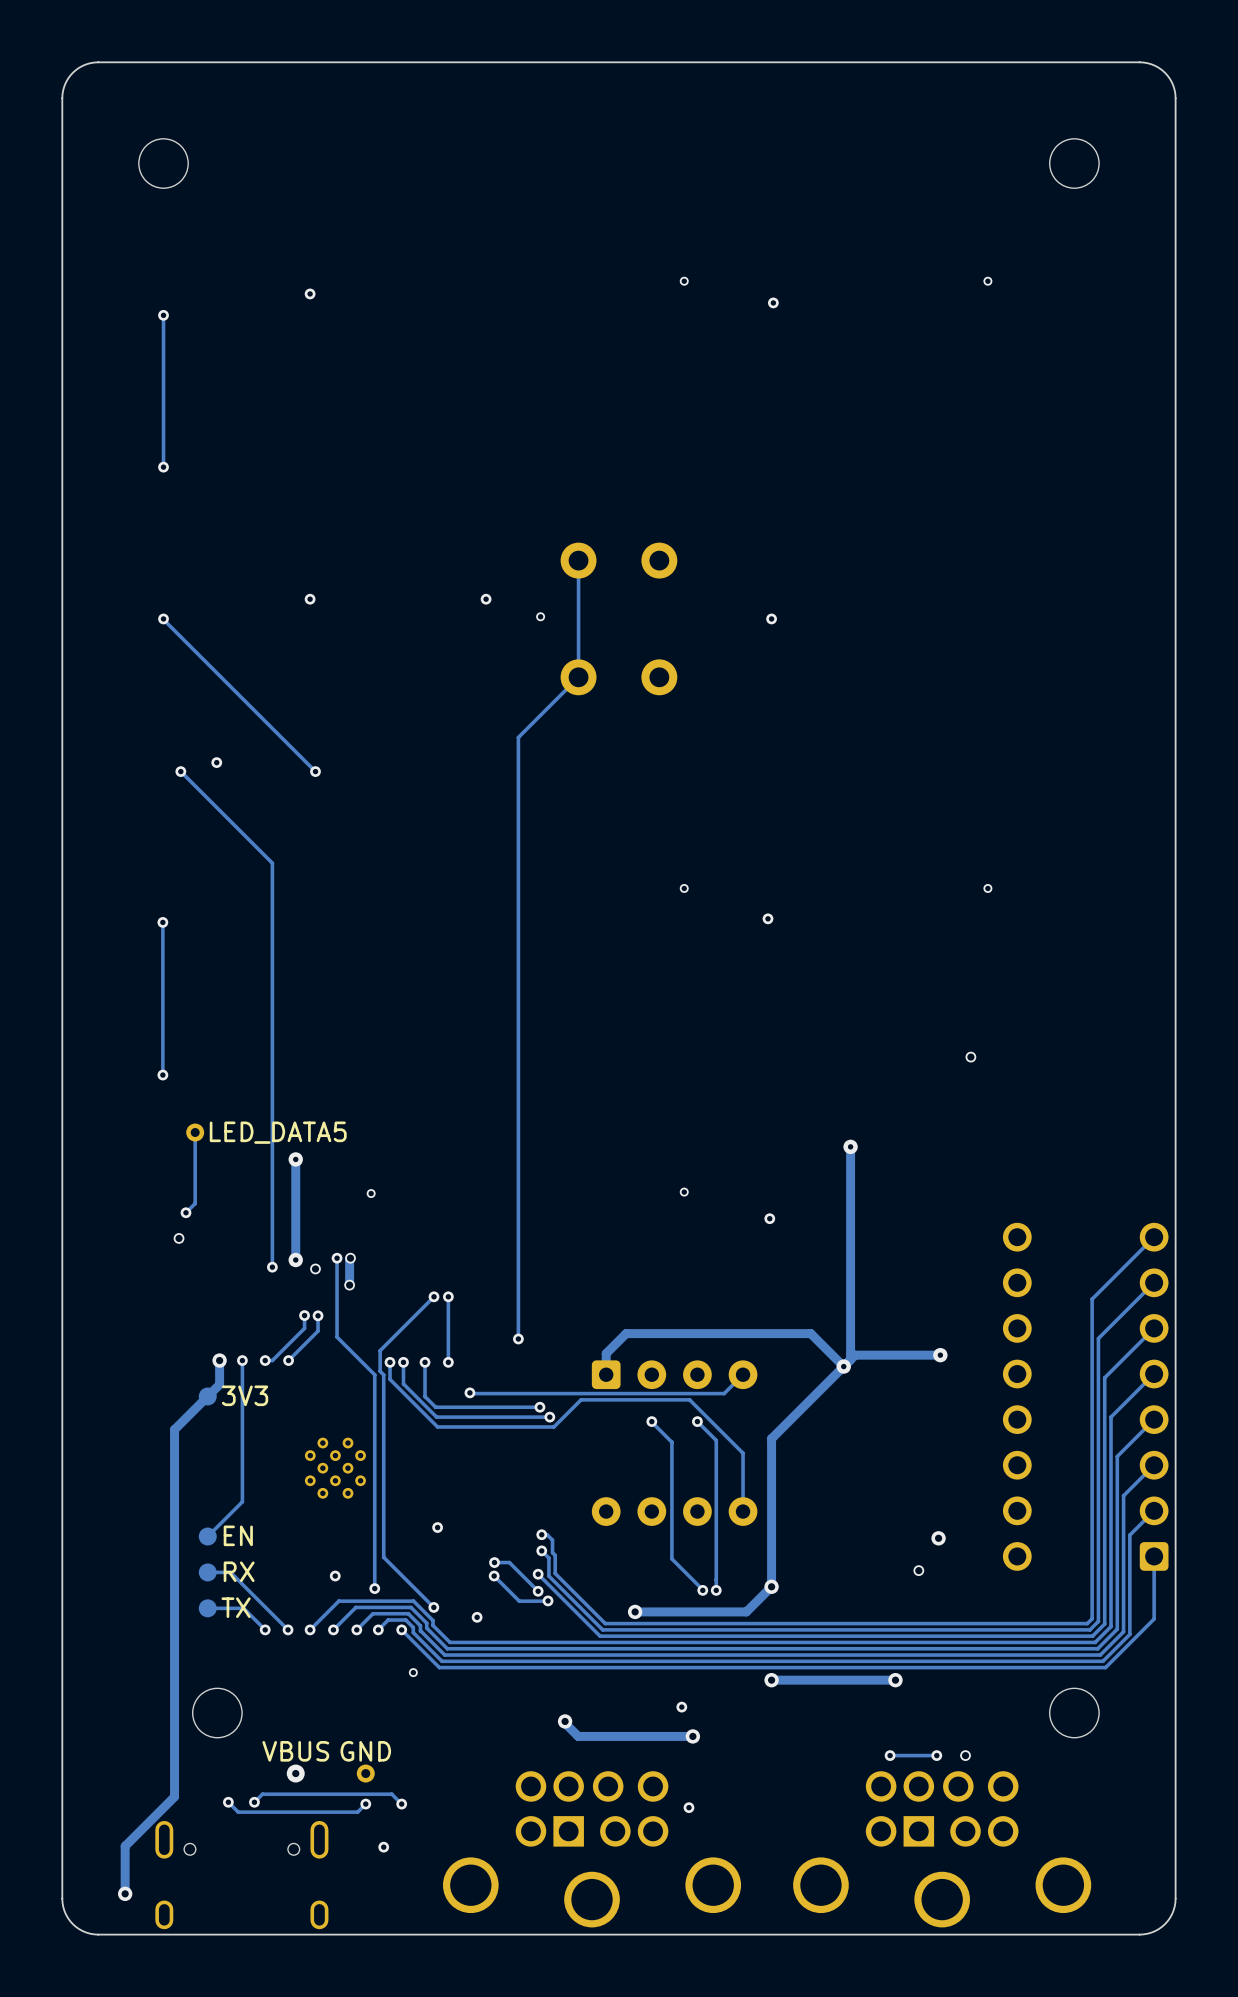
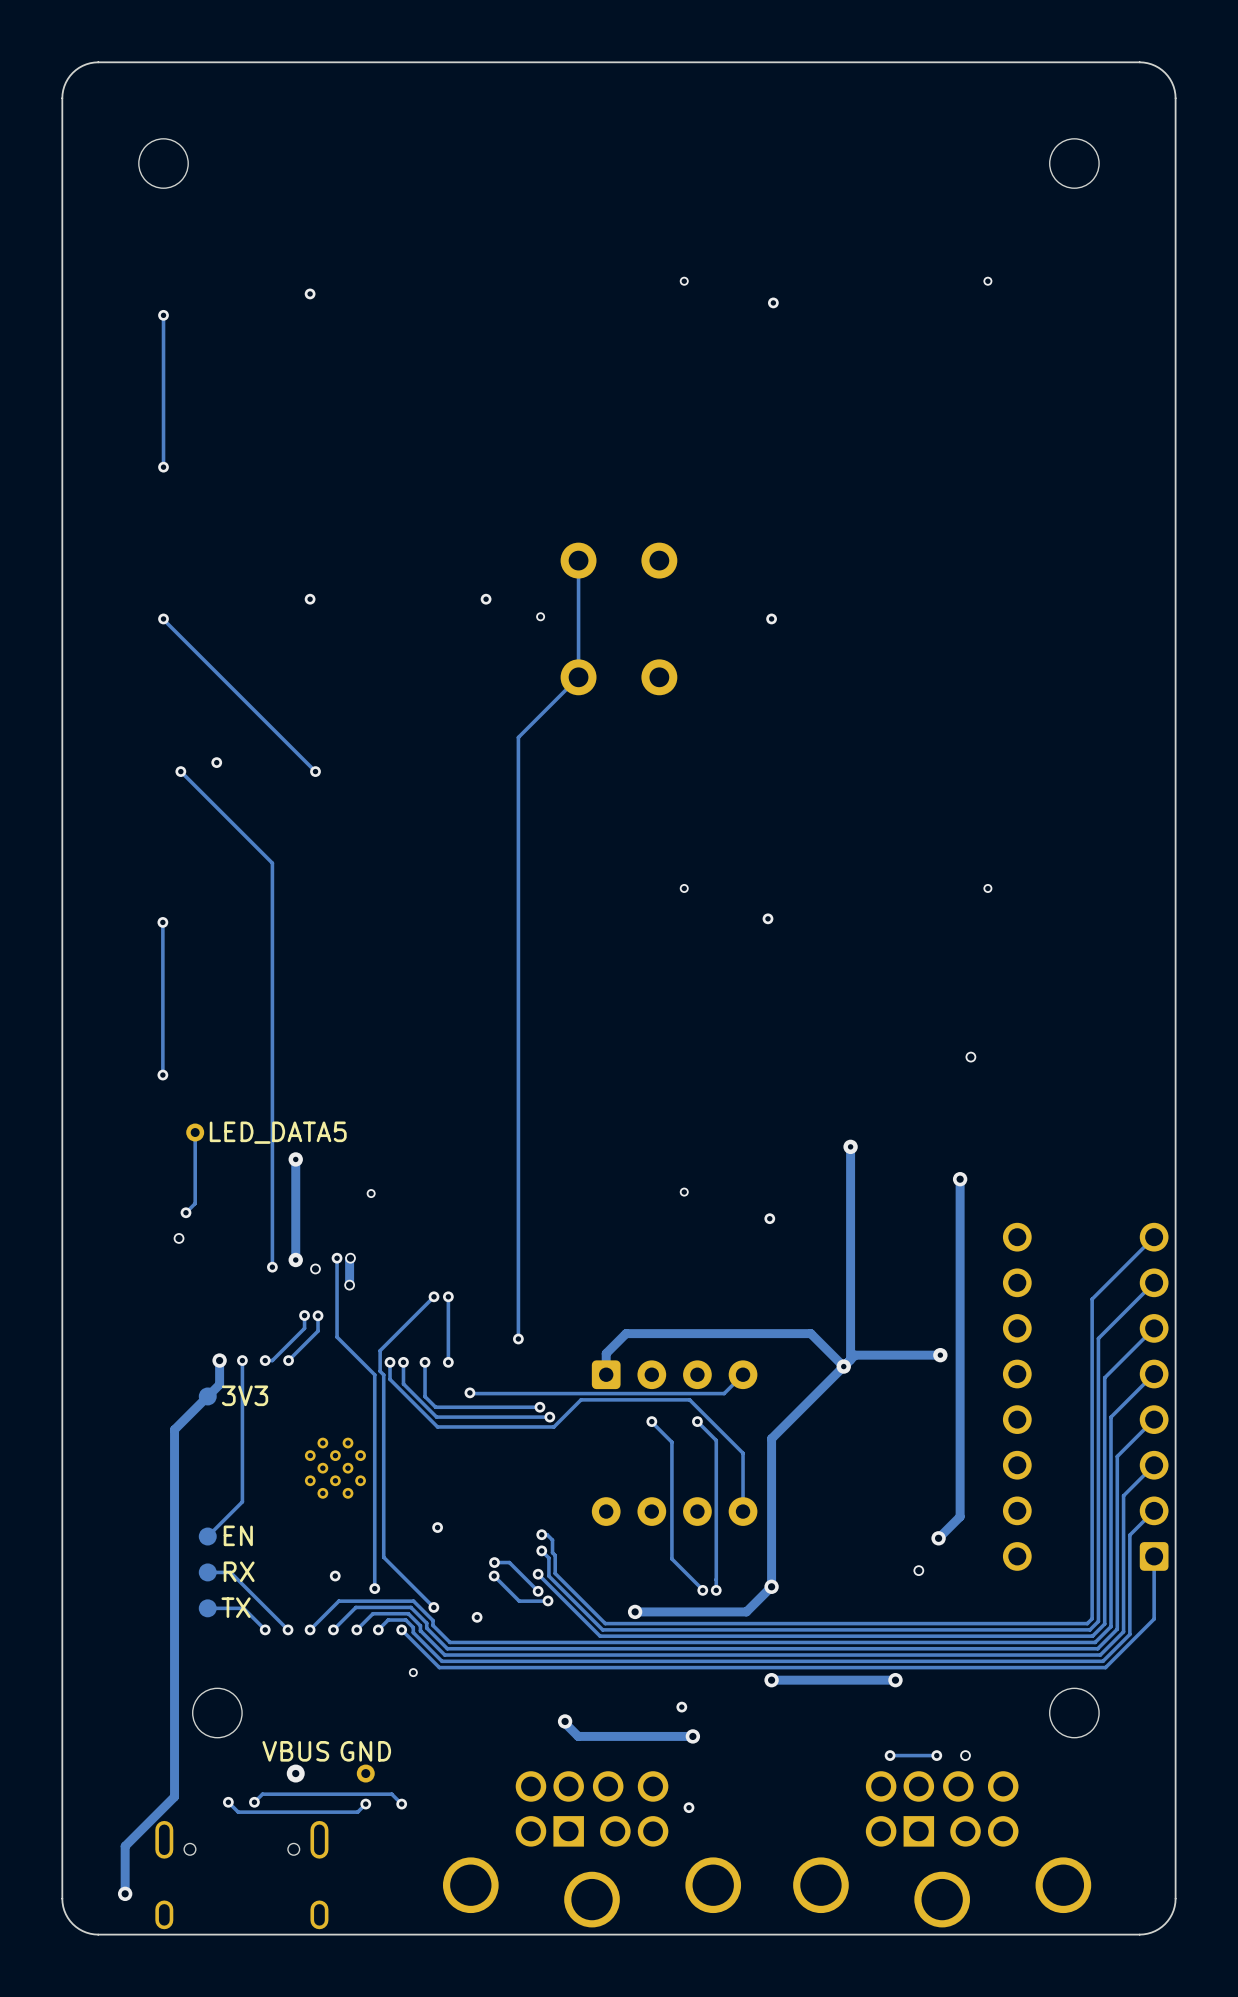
track: none -> (960, 1179) (960, 1516) (938, 1538)
via: none -> (960, 1179)
via: (383, 1847) -> none

